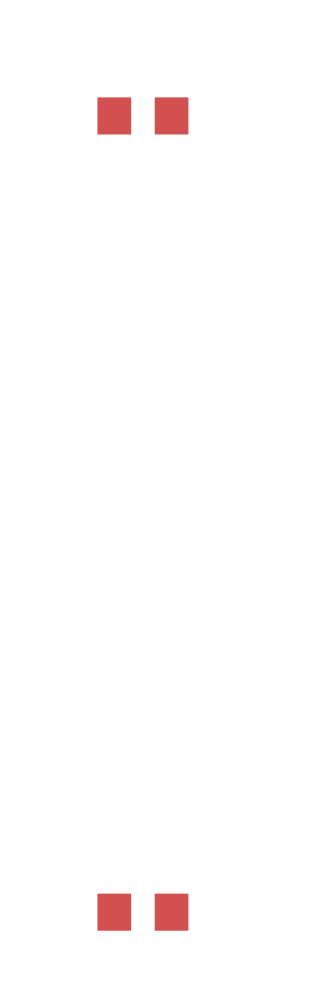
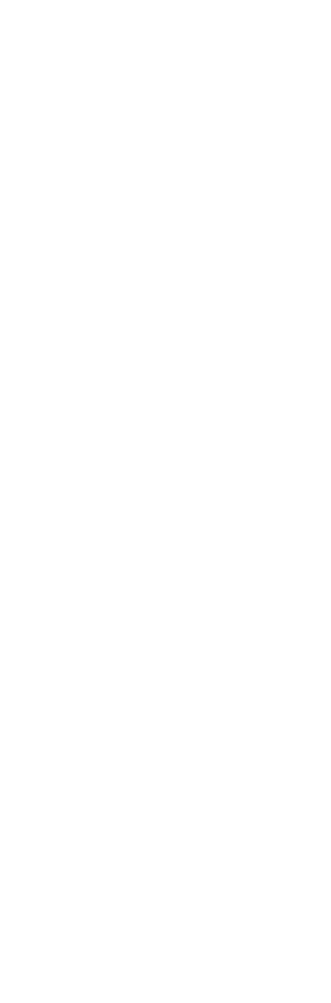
part: (142, 115) -> none
part: (142, 912) -> none

